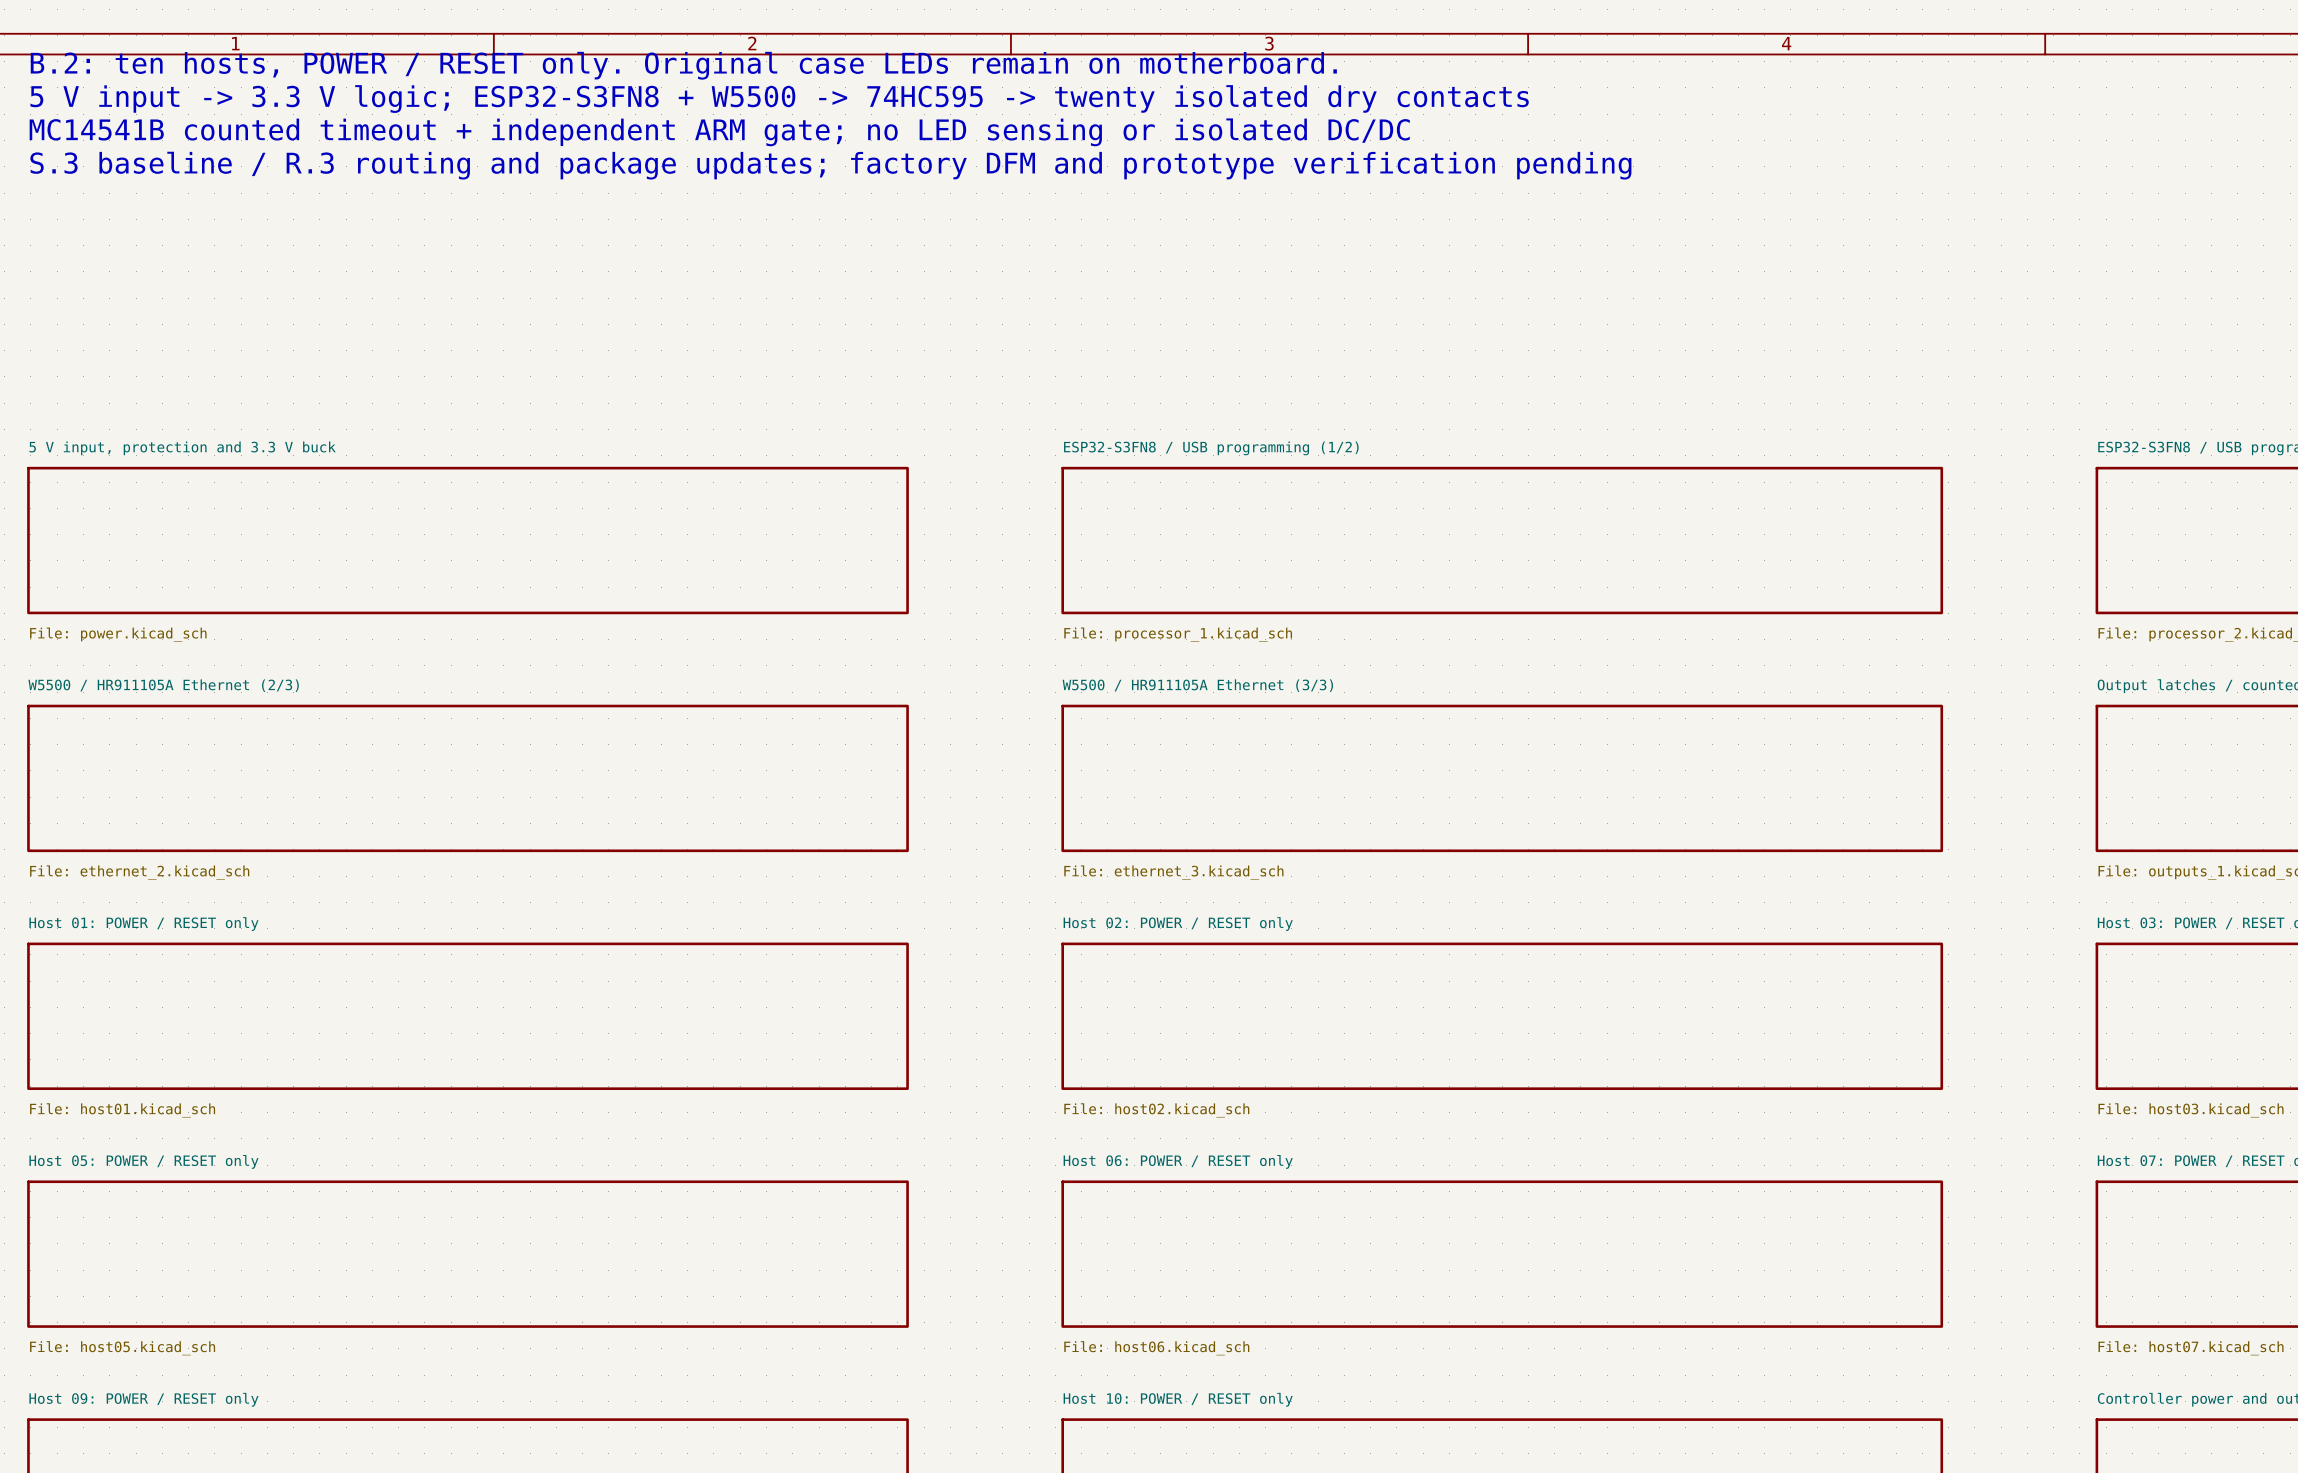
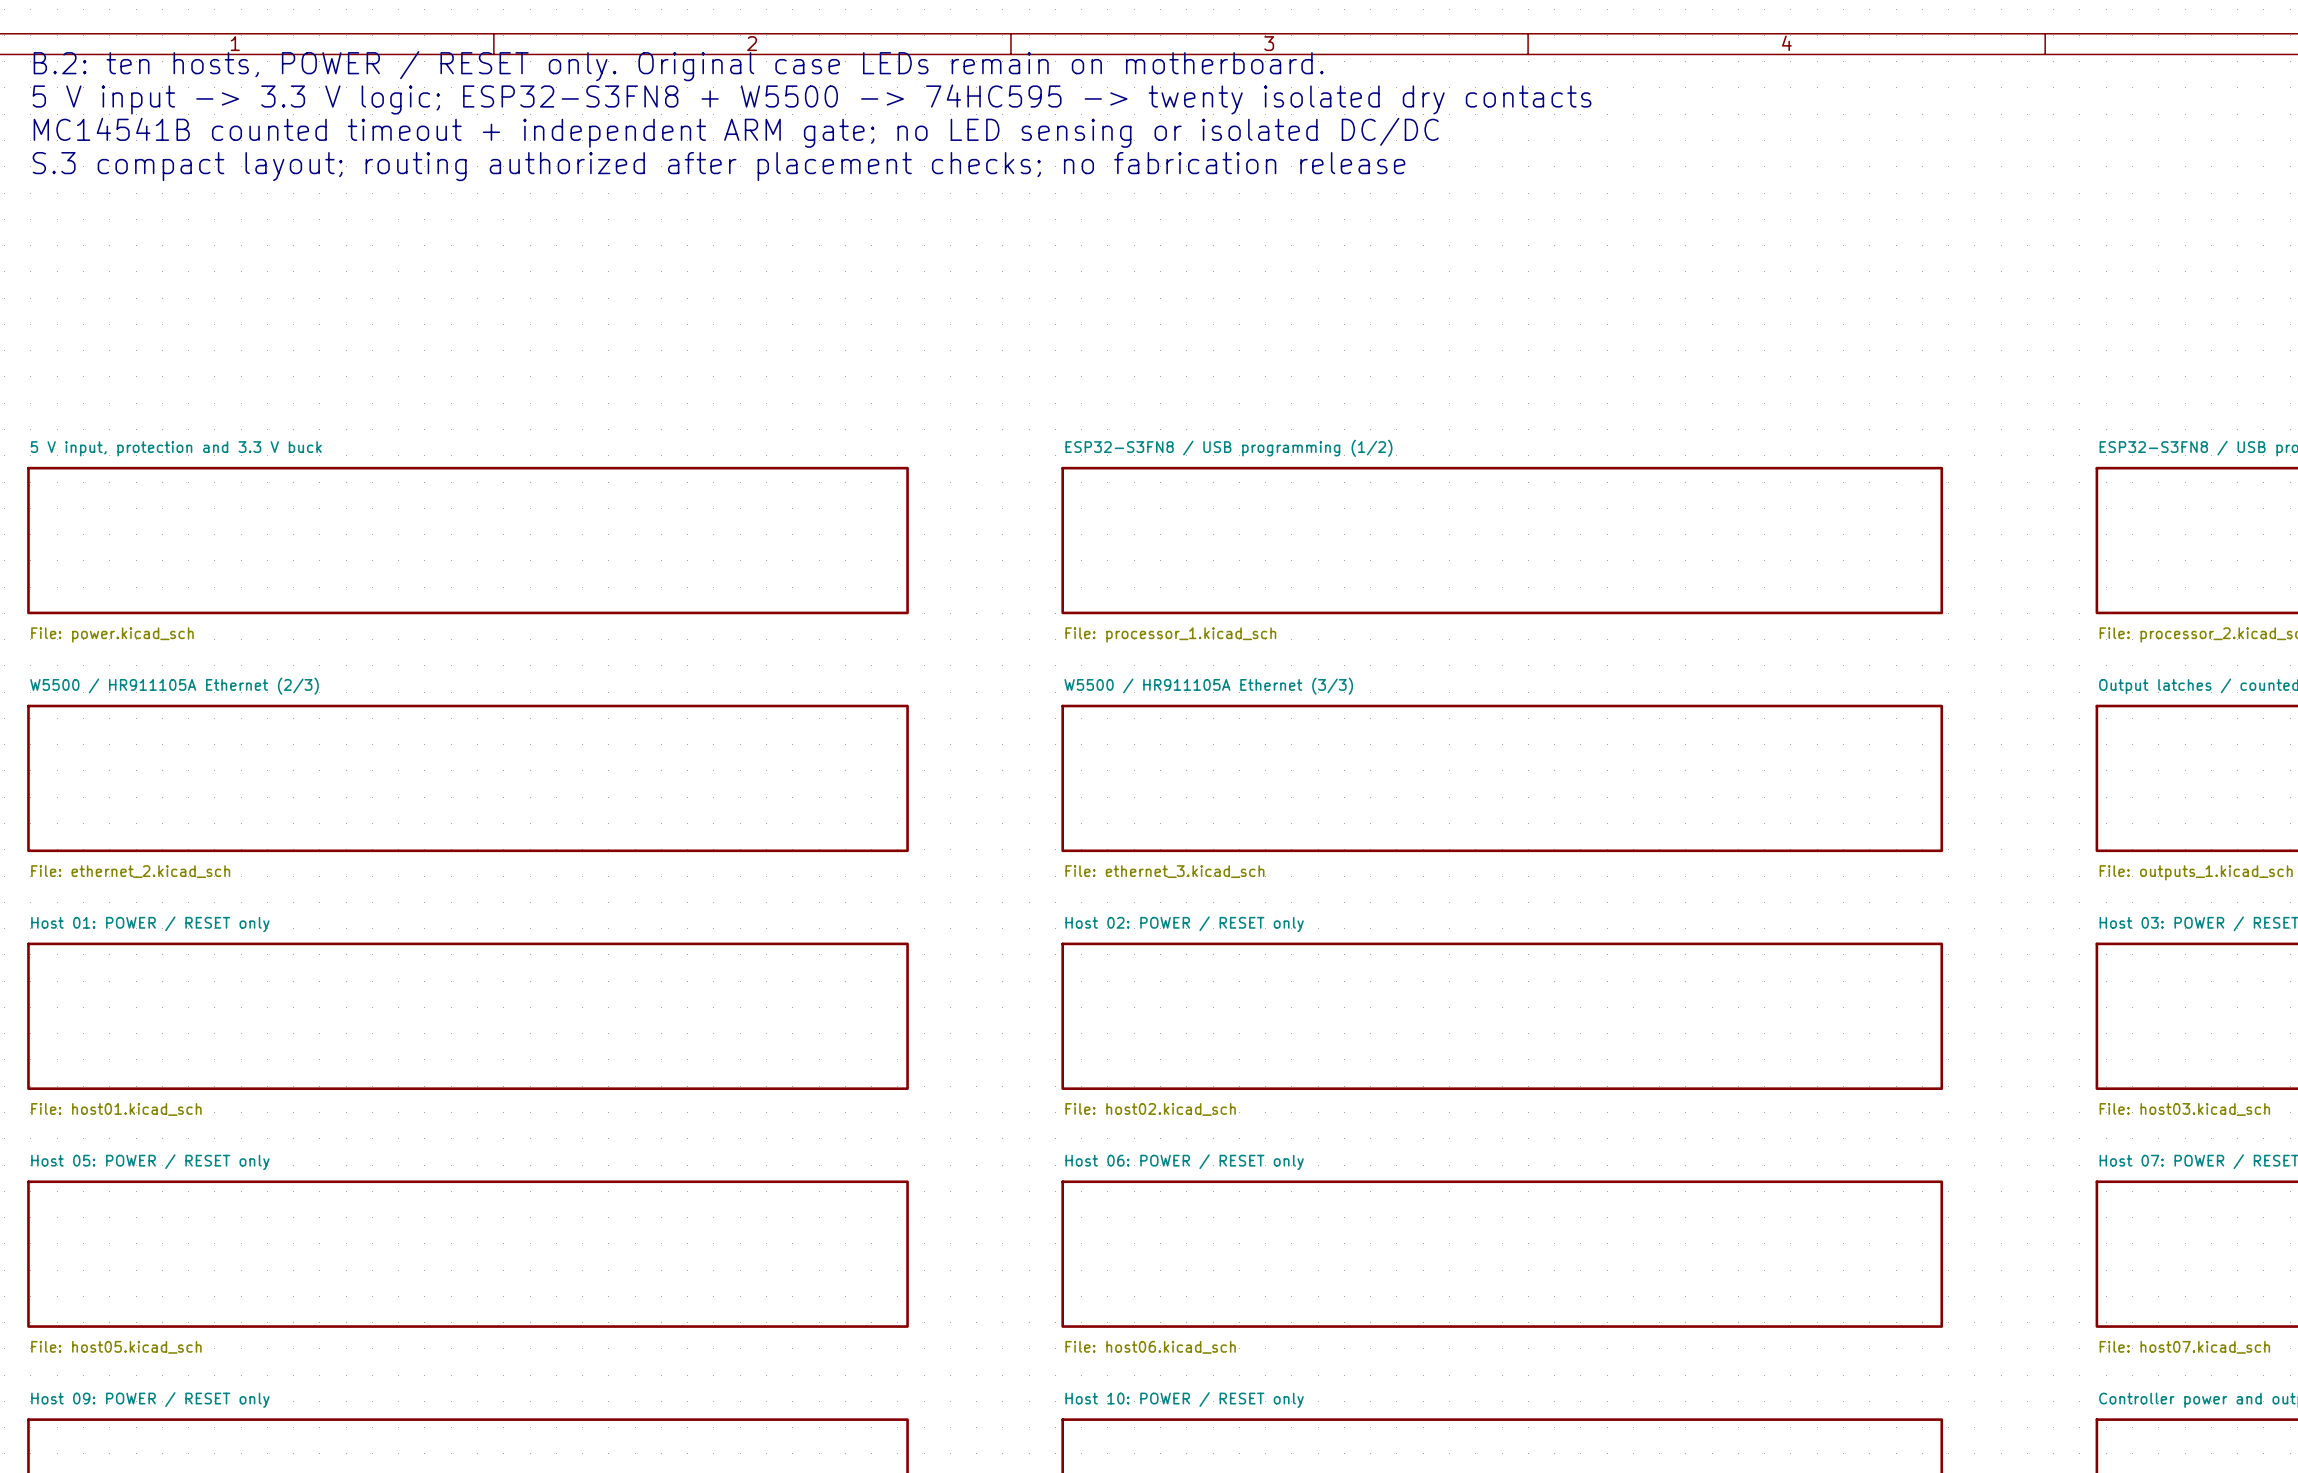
text: S.3 baseline / R.3 routing and package updates; factory DFM and prototype verification pending (830, 165) -> S.3 compact layout; routing authorized after placement checks; no fabrication release (718, 166)

